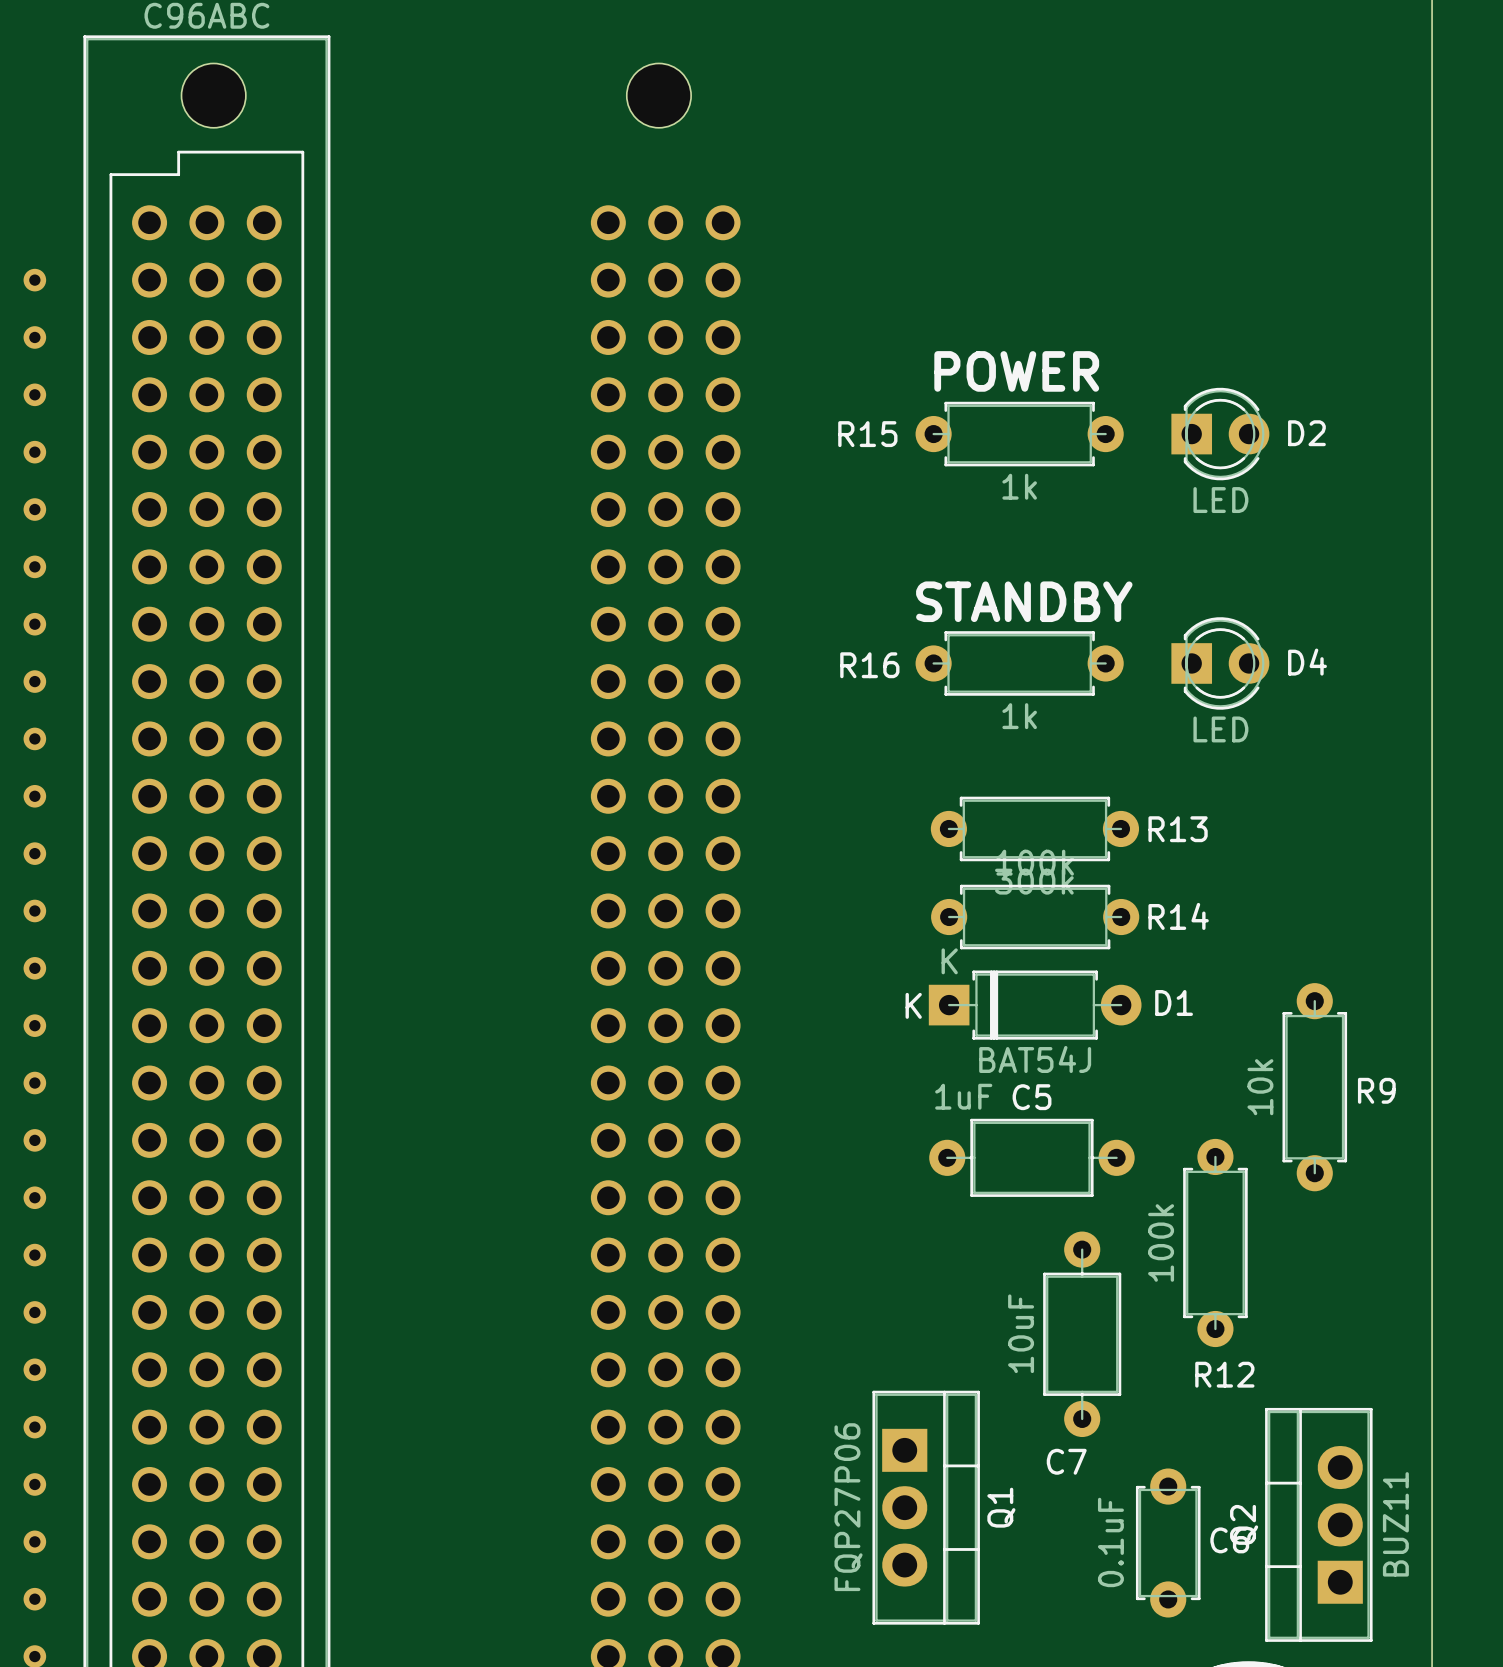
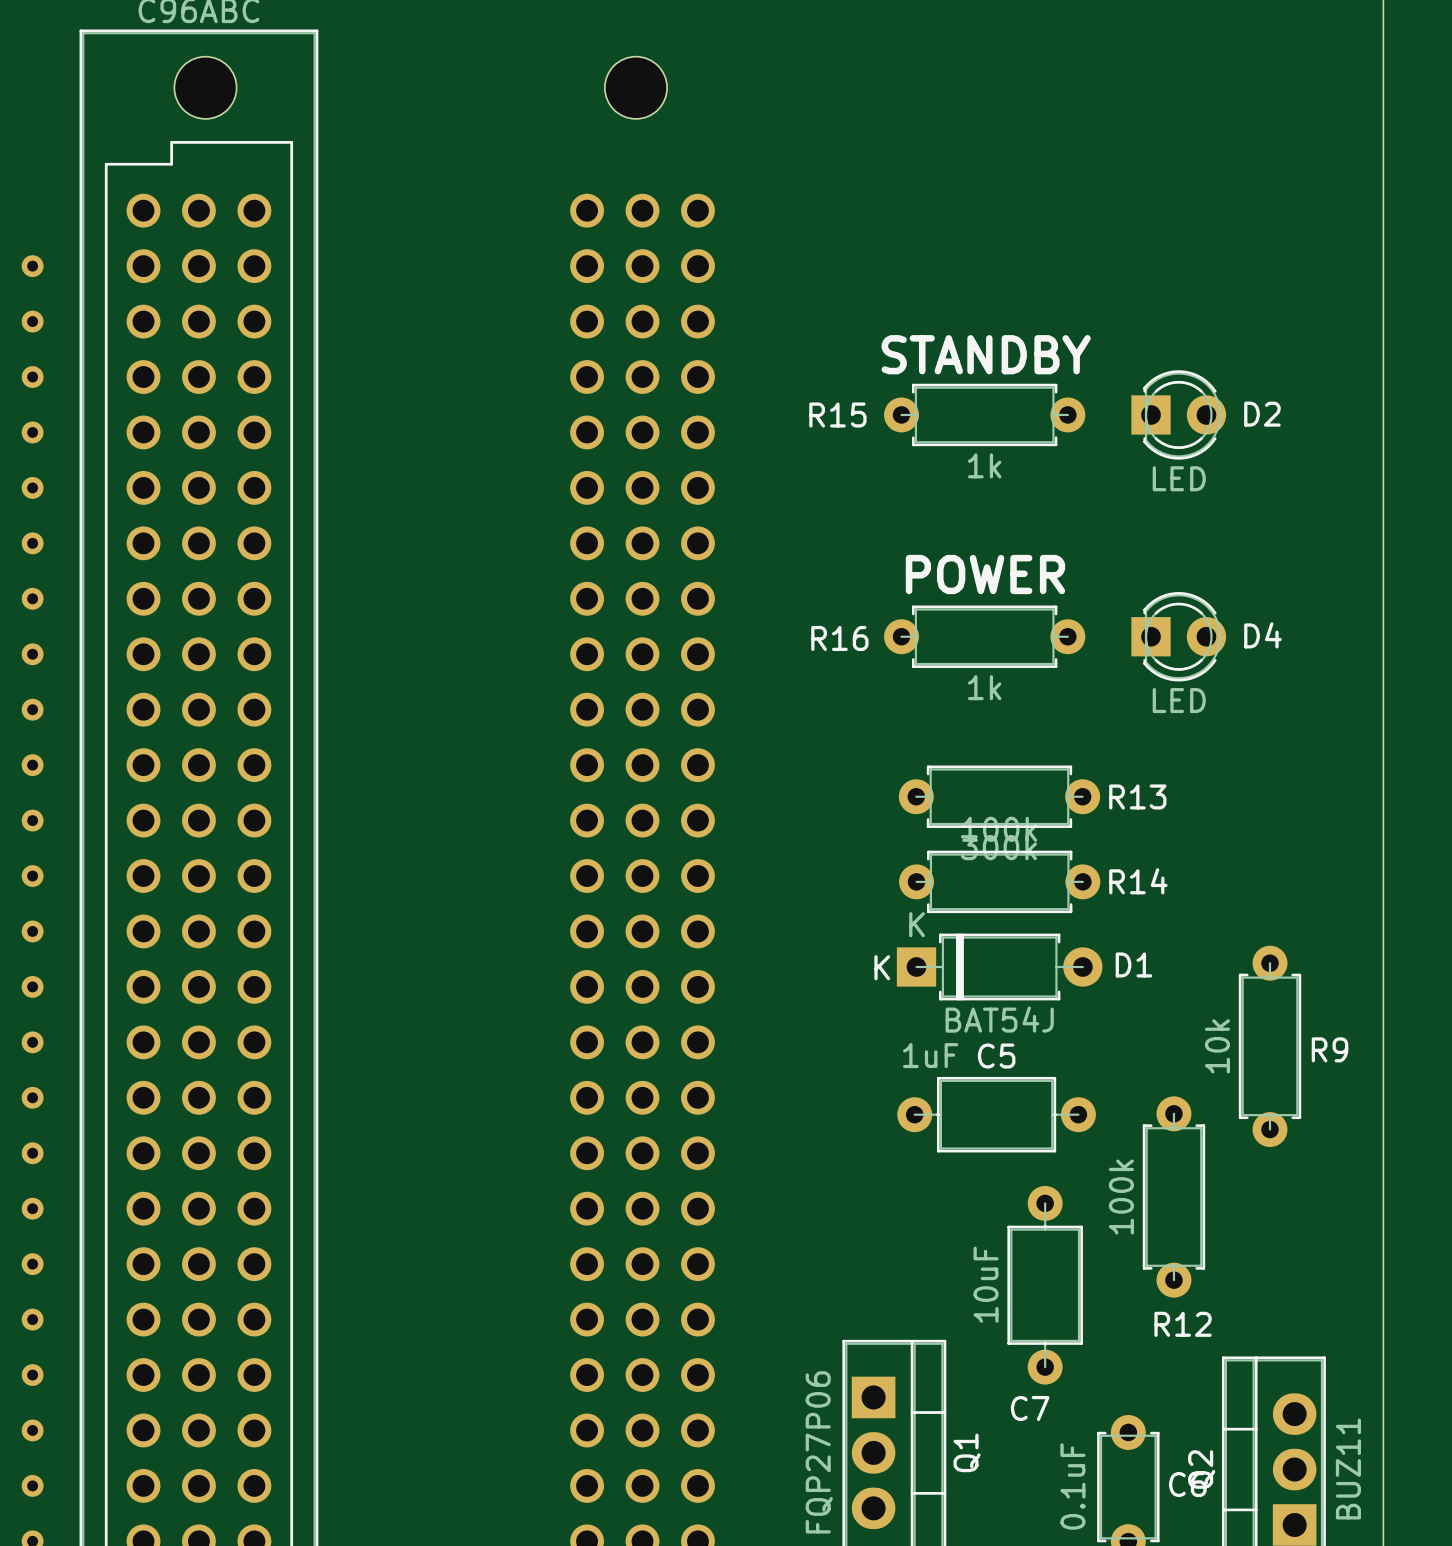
text: POWER (1016, 371) -> STANDBY (986, 354)
text: STANDBY (1024, 601) -> POWER (985, 574)

